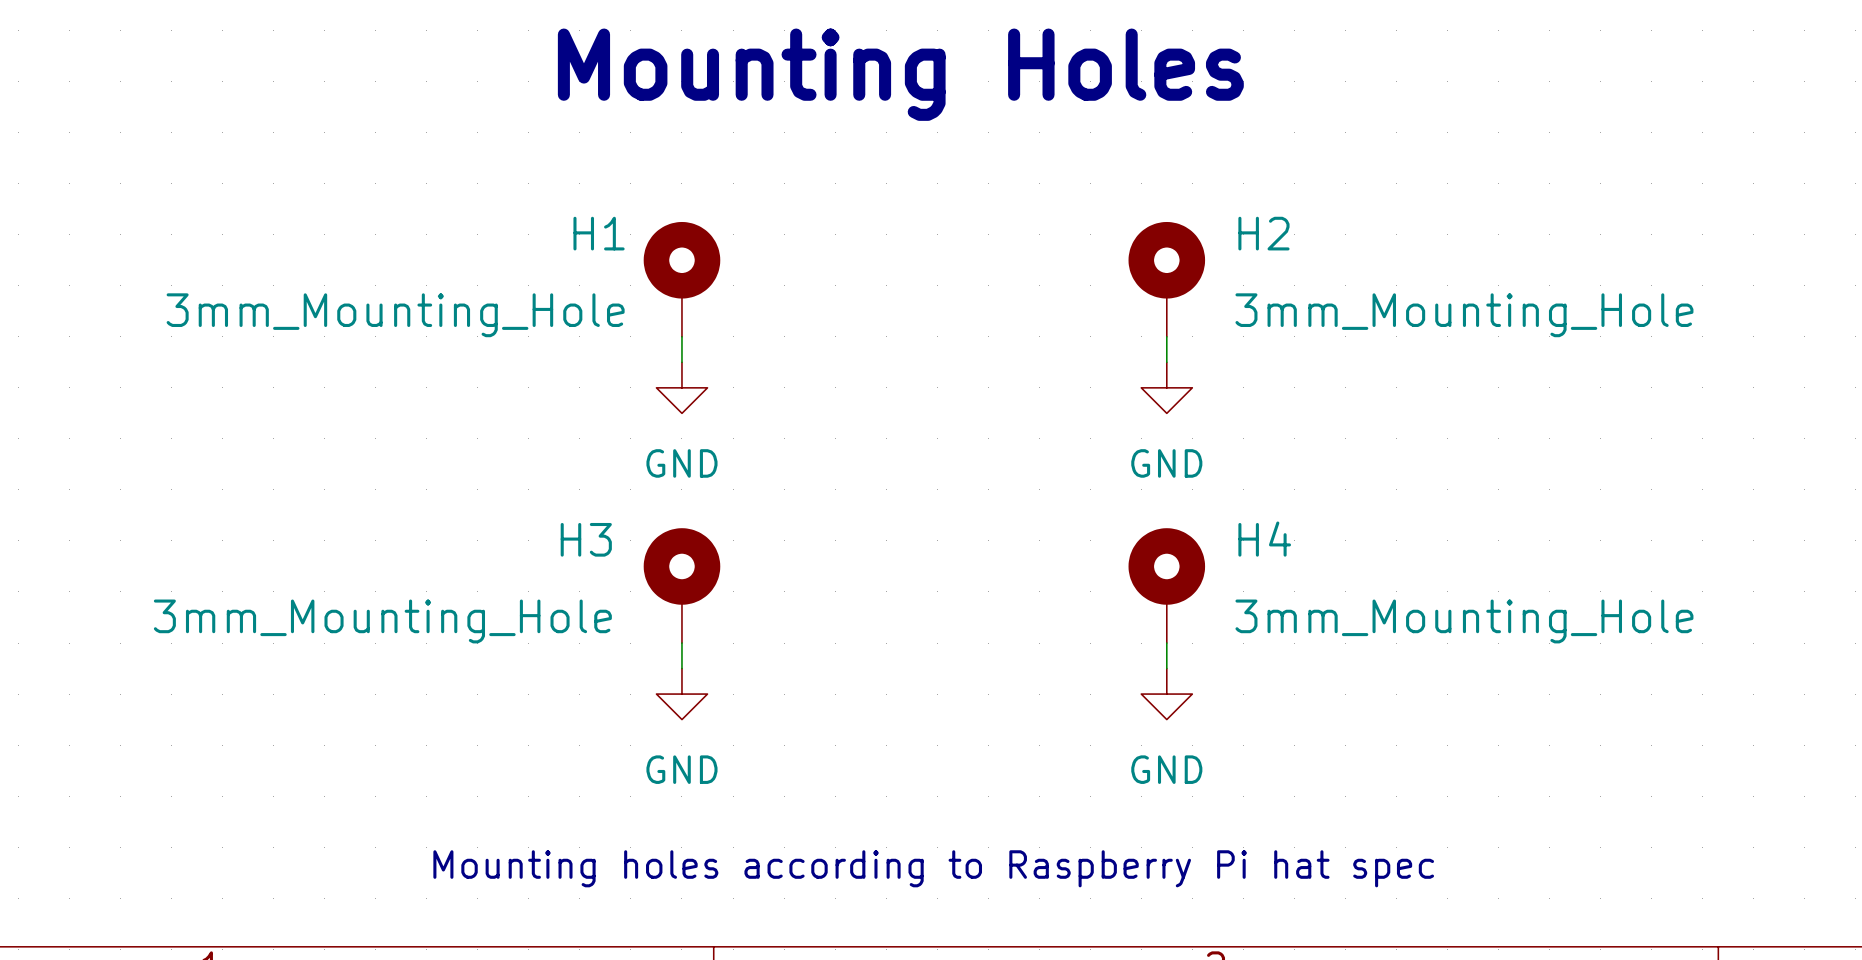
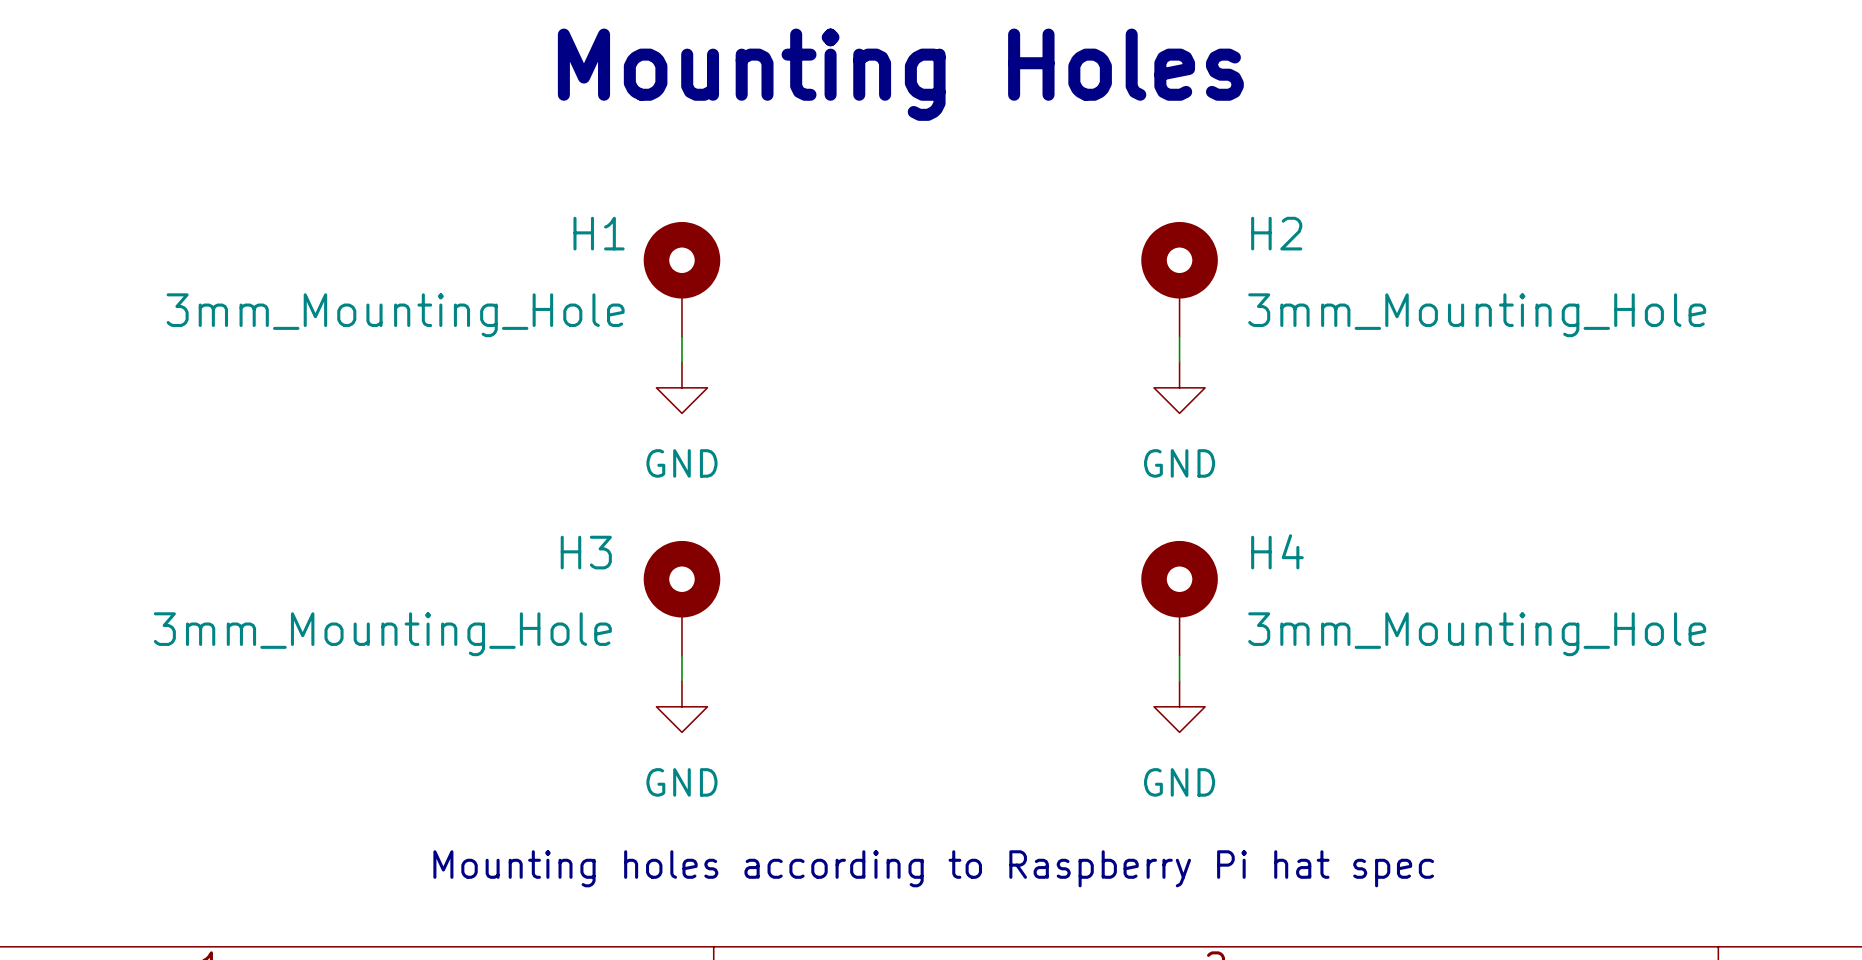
H2 position: (1166, 279) -> (1179, 279)
wire: (1166, 336) (1166, 362) -> (1179, 336) (1179, 362)
power symbol position: GND (1166, 387) -> GND (1179, 387)
H3 position: (681, 585) -> (681, 598)
H4 position: (1166, 585) -> (1179, 598)
wire: (1166, 643) (1166, 668) -> (1179, 655) (1179, 681)
power symbol position: GND (681, 694) -> GND (681, 706)
power symbol position: GND (1166, 694) -> GND (1179, 706)

